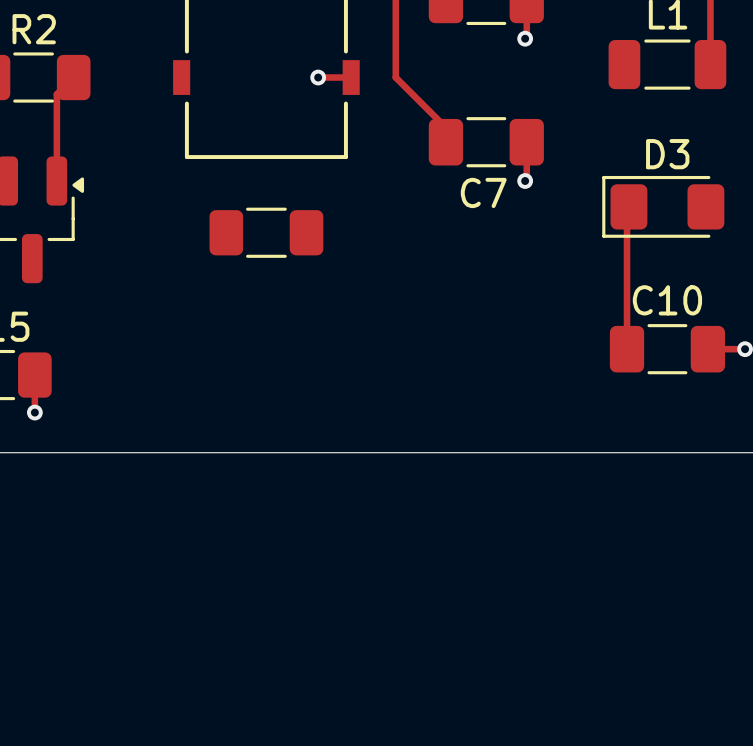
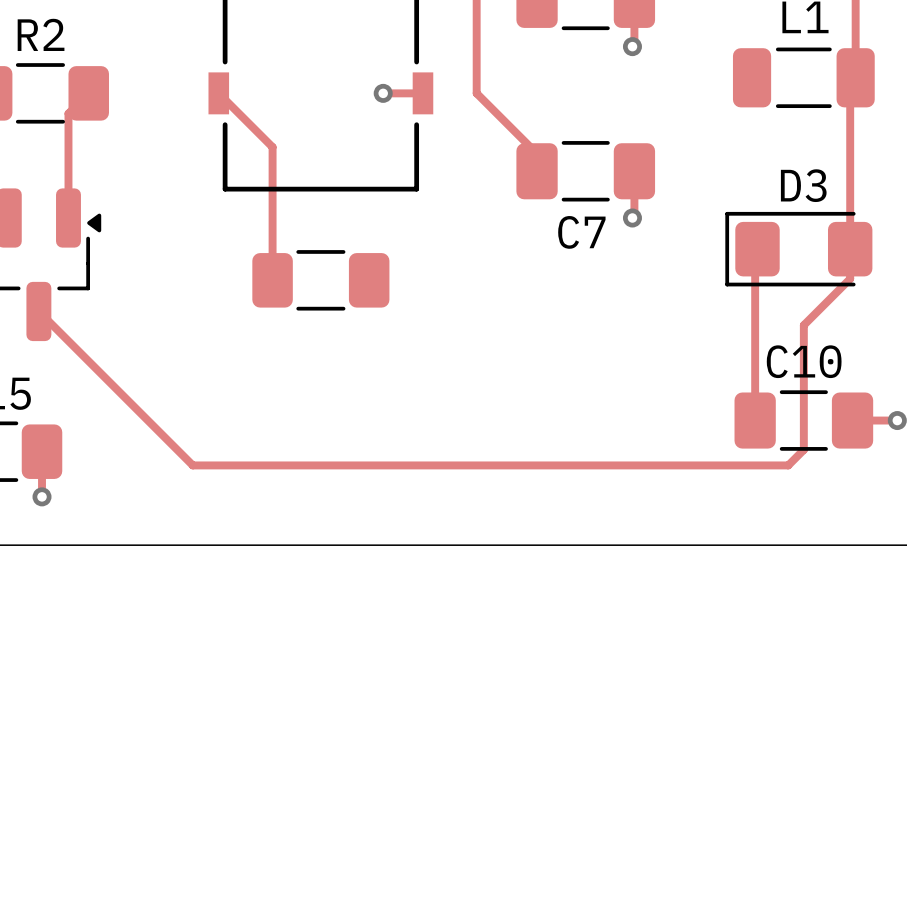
track: none -> (855, 77) (850, 83) (850, 278) (803, 325) (803, 449) (788, 465) (192, 465) (38, 311)
track: none -> (218, 93) (272, 147) (272, 280)

